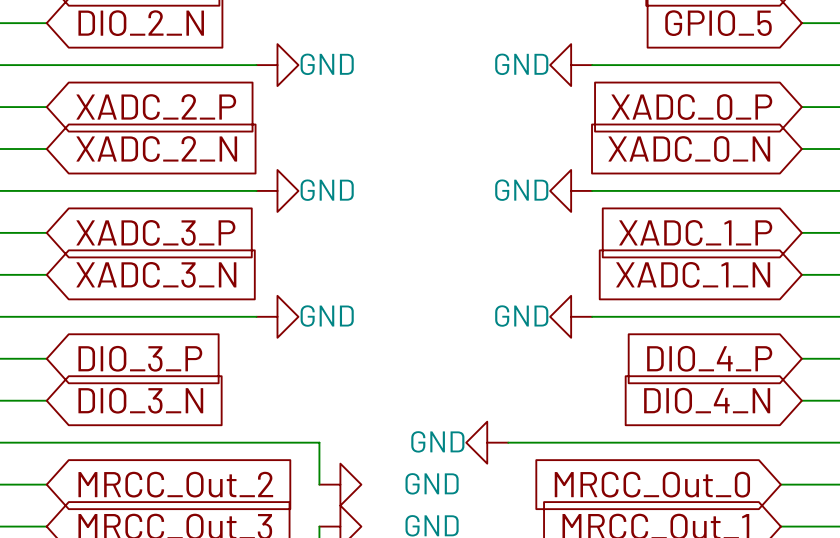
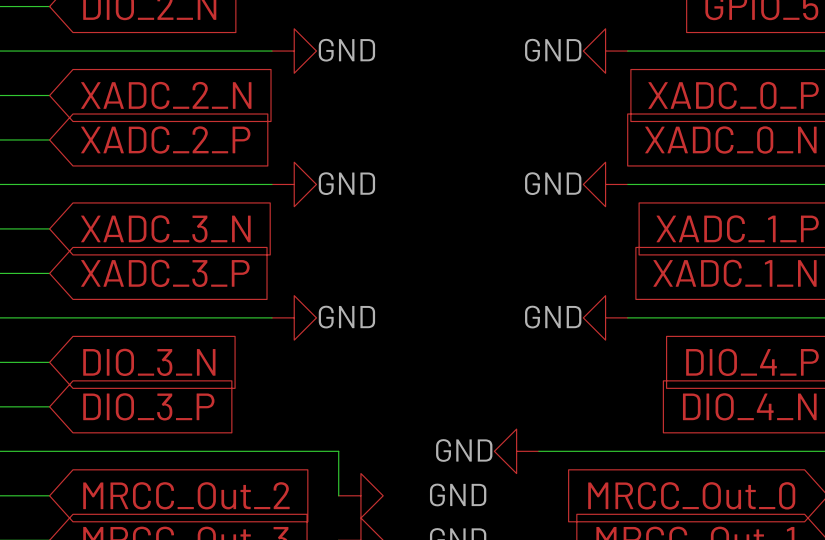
global label: XADC_2_P (156, 107) -> XADC_2_N (166, 95)
global label: XADC_2_N (156, 149) -> XADC_2_P (165, 140)
global label: XADC_3_P (155, 232) -> XADC_3_N (165, 228)
global label: XADC_3_N (156, 274) -> XADC_3_P (165, 273)
global label: DIO_3_P (140, 358) -> DIO_3_N (149, 362)
global label: DIO_3_N (140, 400) -> DIO_3_P (148, 406)

